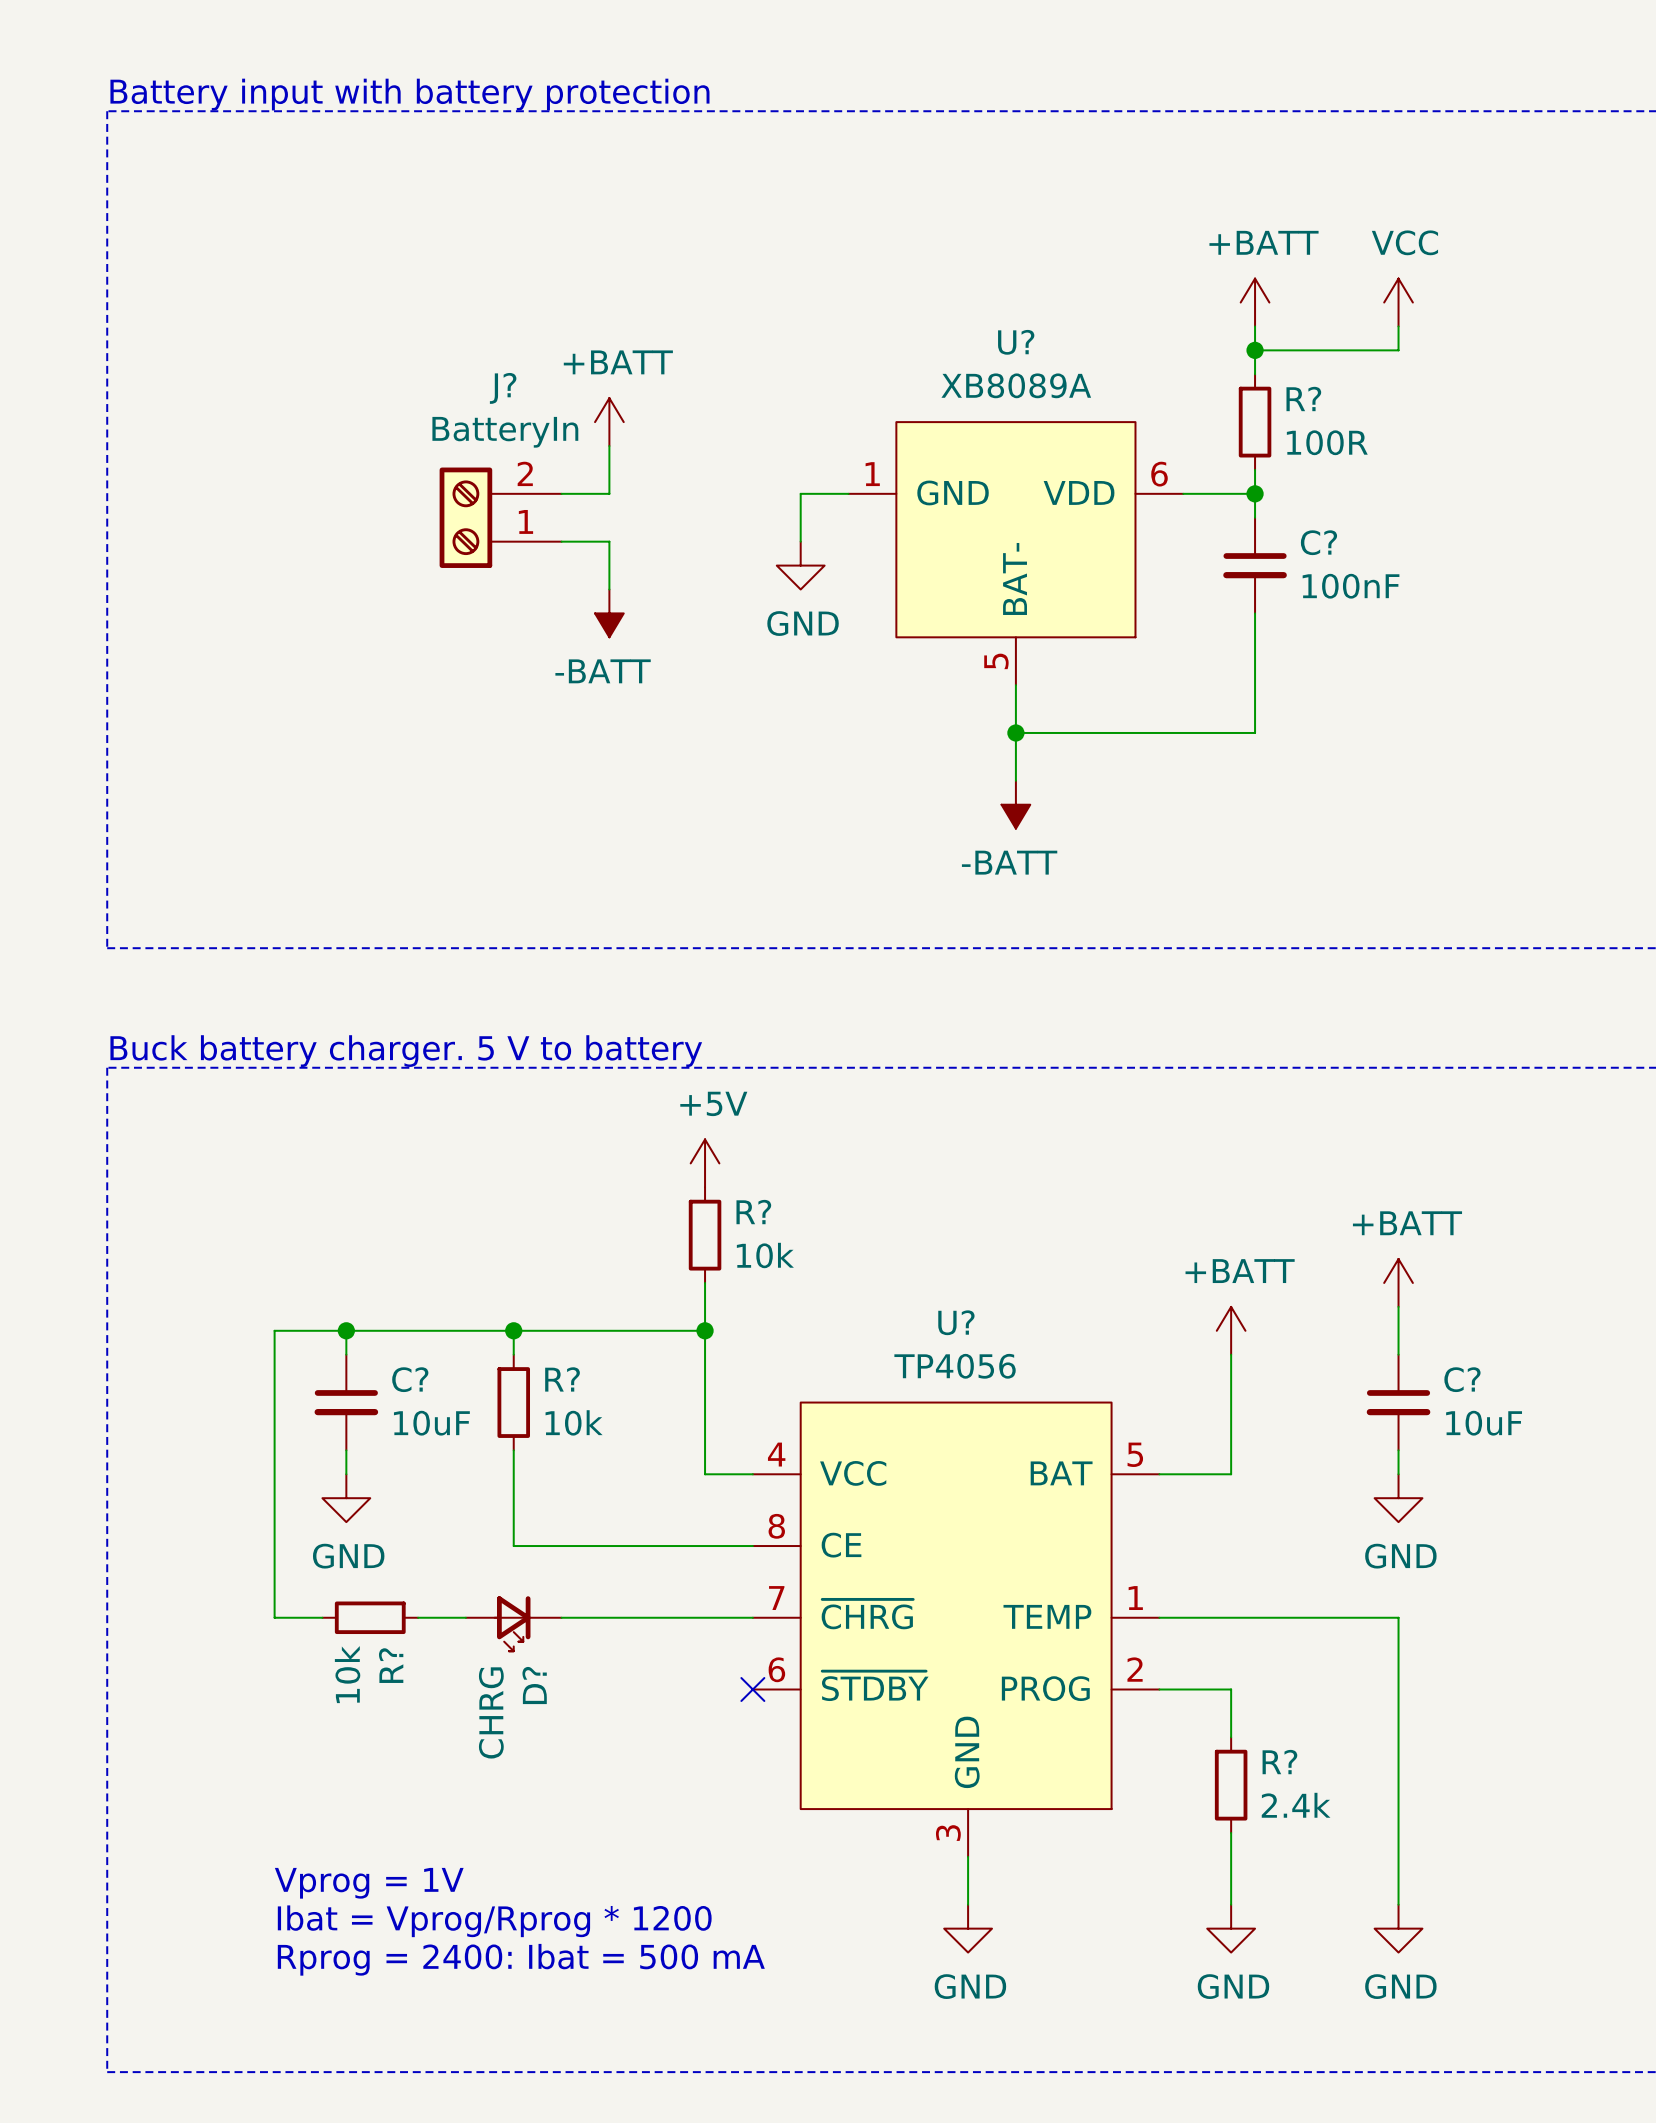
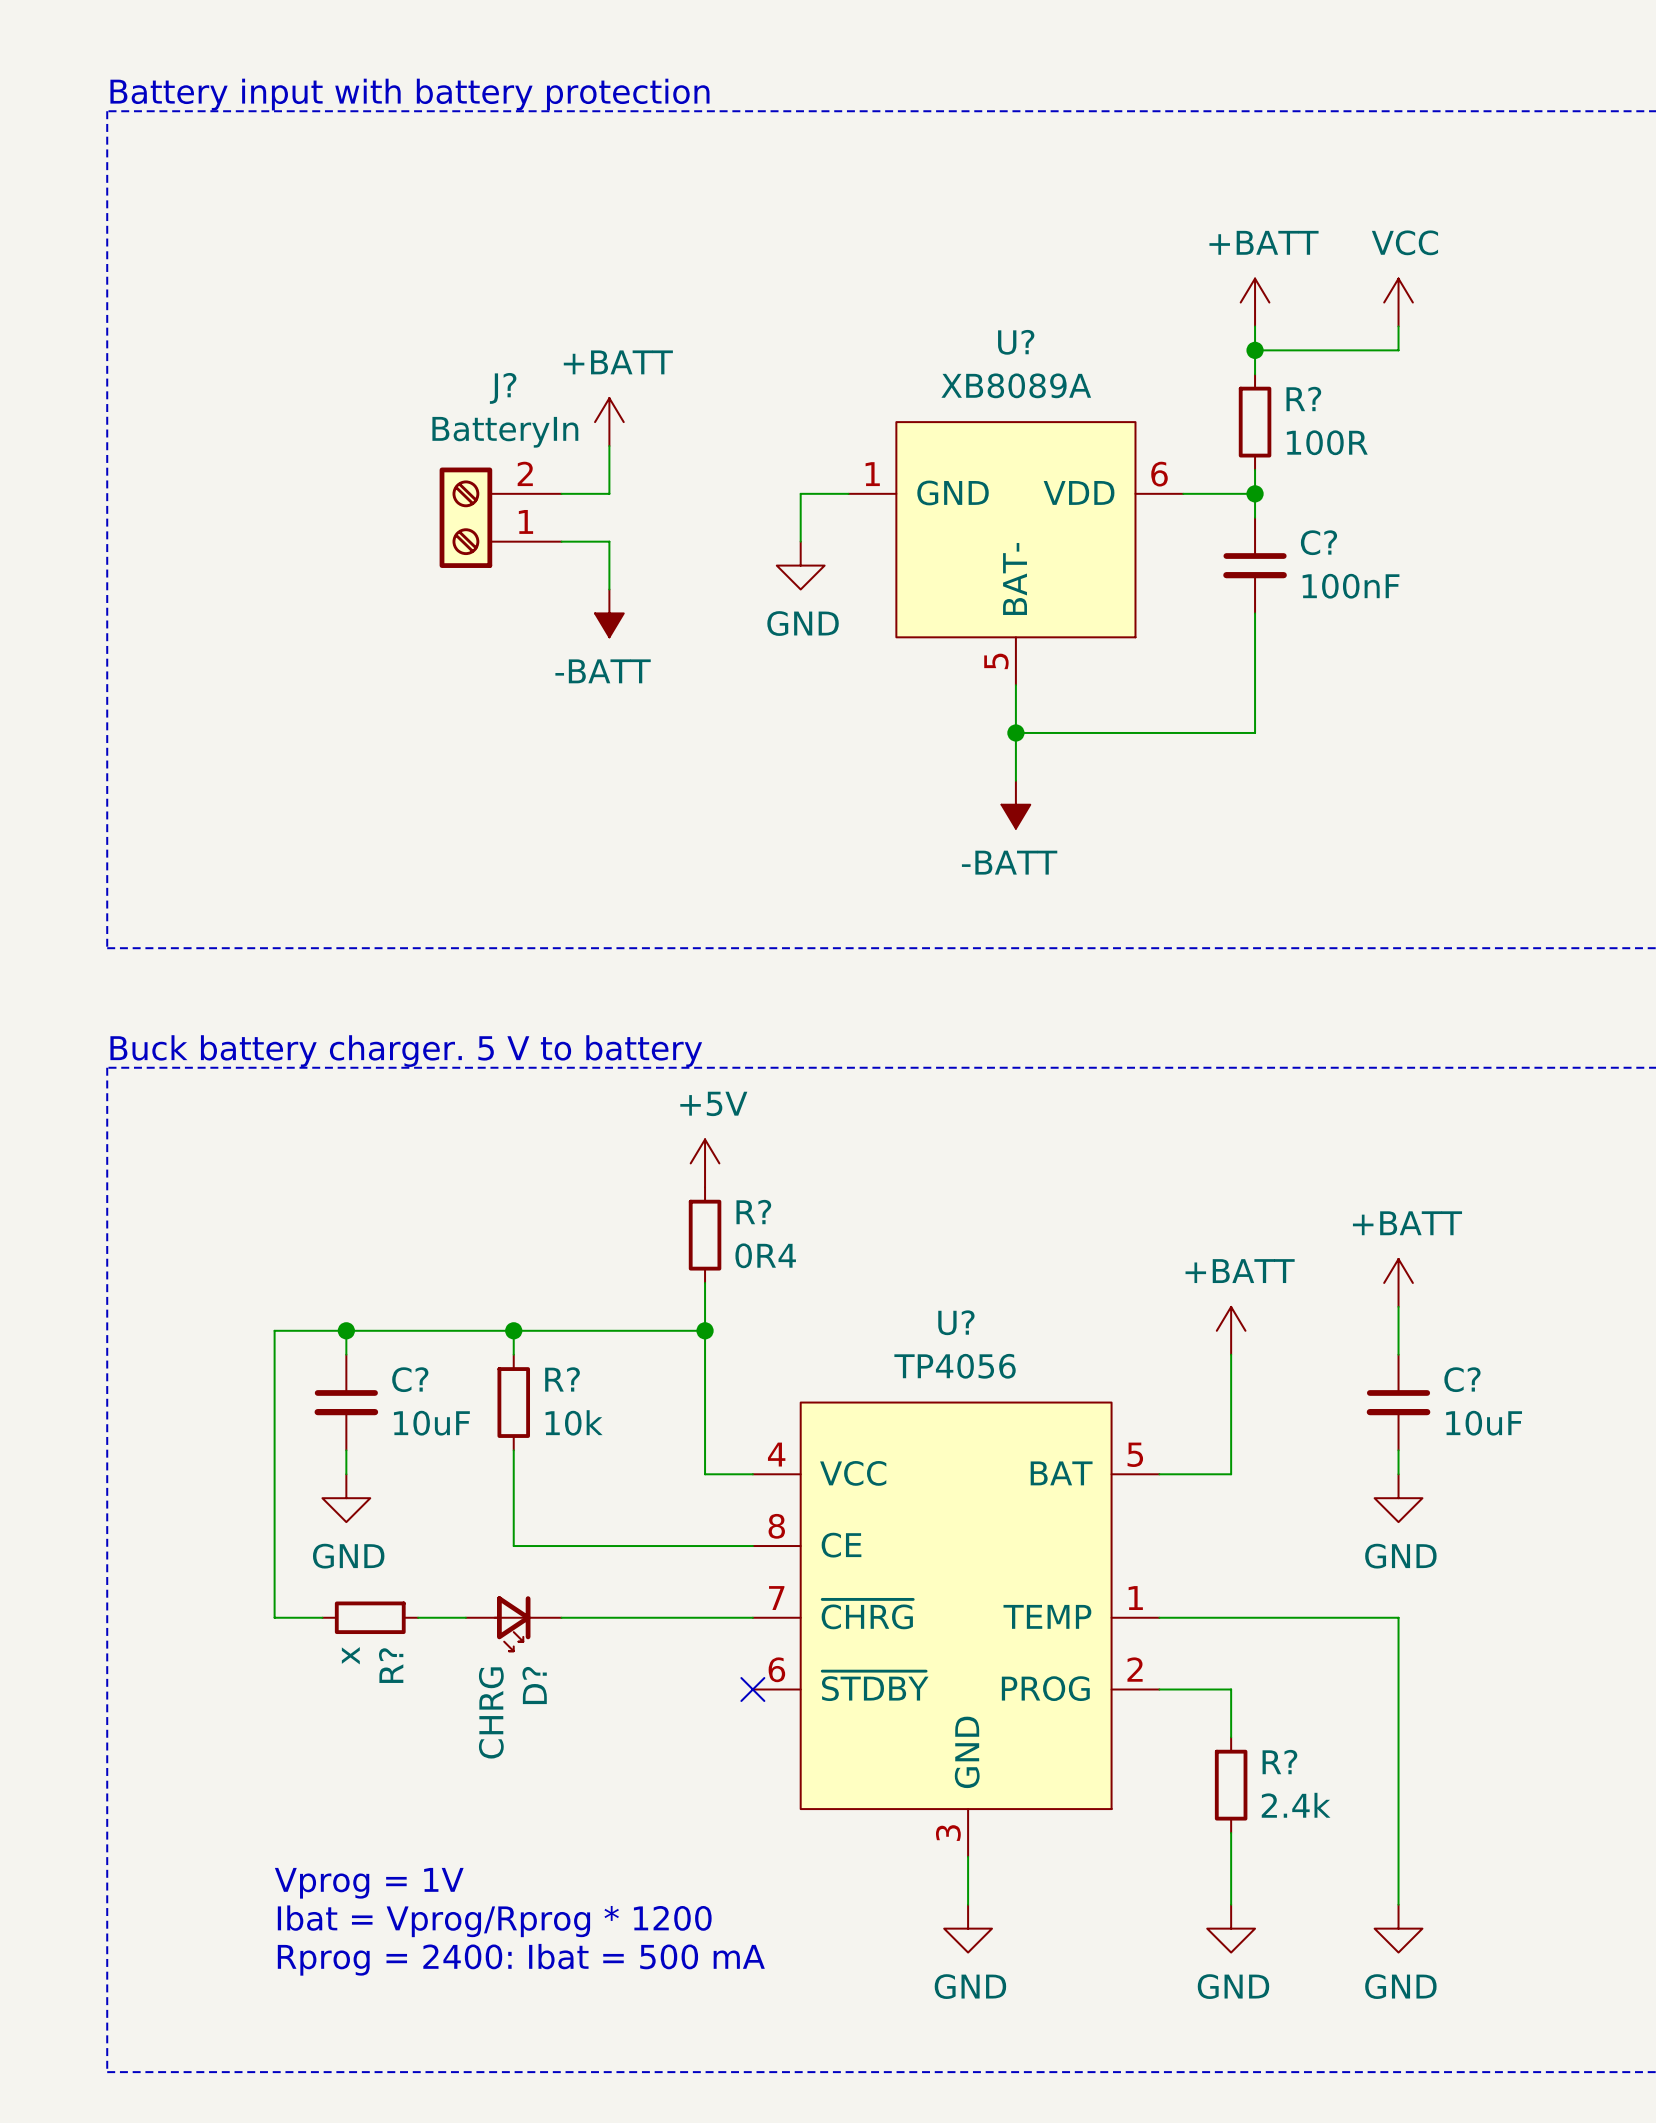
R? value: 10k (765, 1255) -> 0R4 (765, 1255)
R? value: 10k (347, 1674) -> x (350, 1655)

